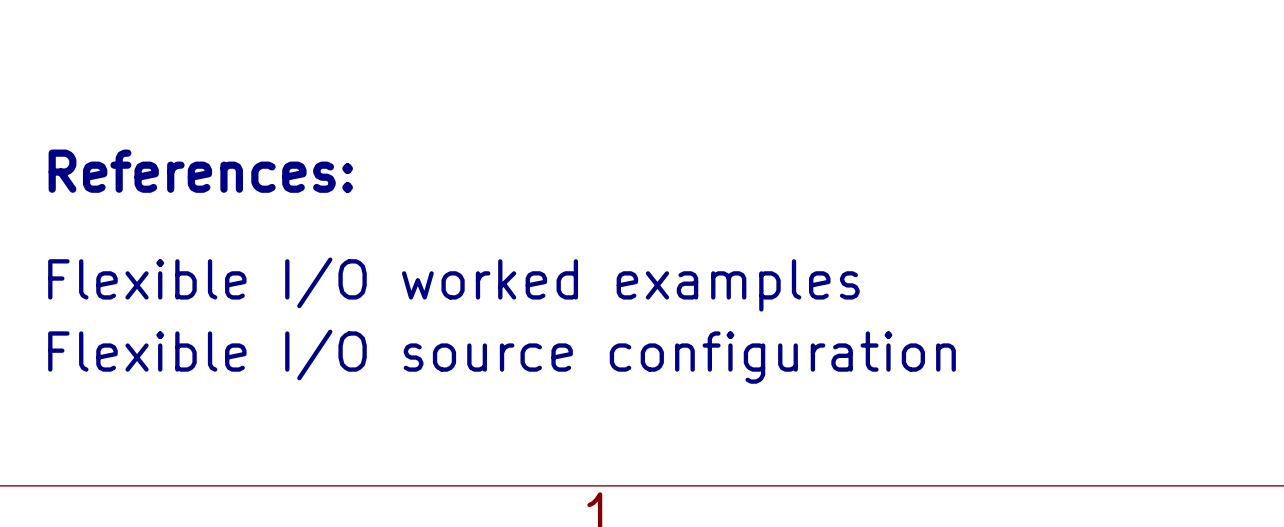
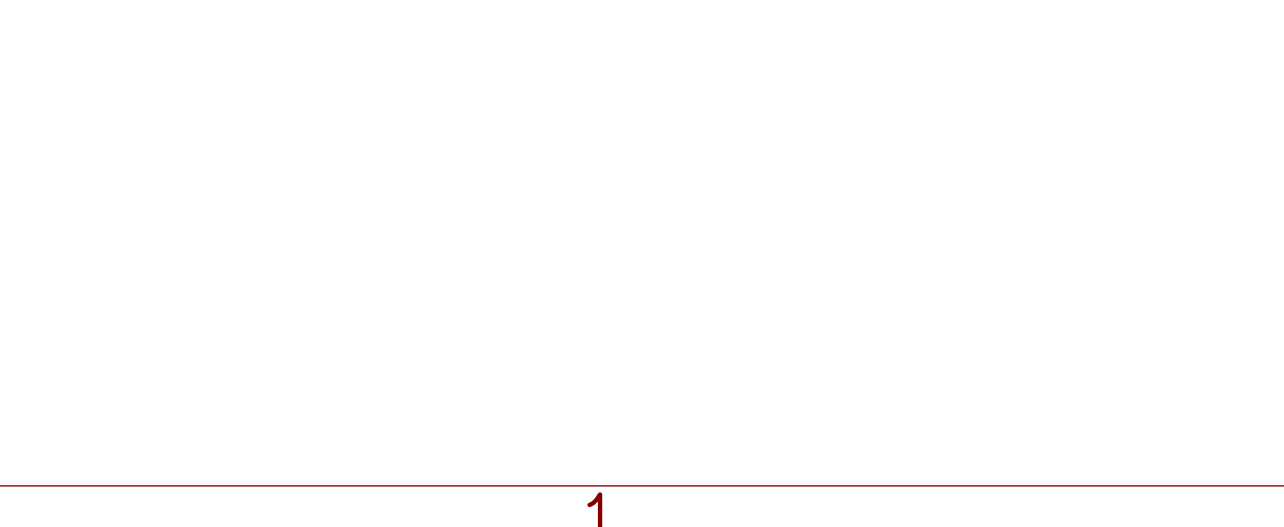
text: References: (200, 171) -> none
text: Flexible I/O worked examples (453, 284) -> none
text: Flexible I/O source configuration (502, 356) -> none

